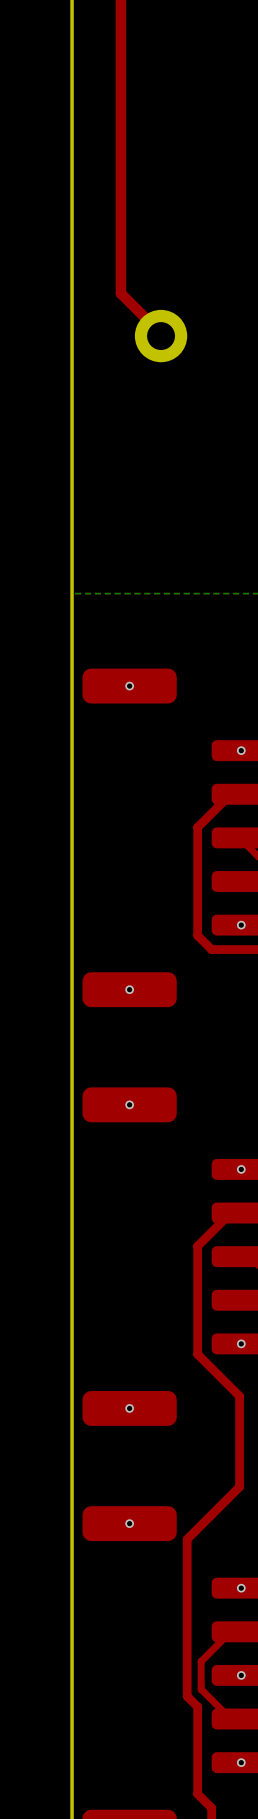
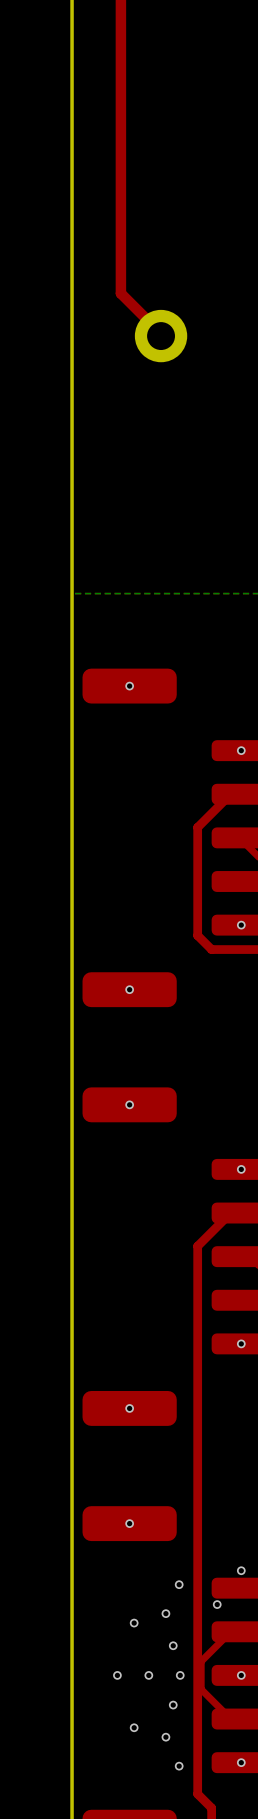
top track: (197, 1354) (239, 1396) (239, 1486) (187, 1539) (187, 1696) (197, 1706) -> (197, 1354) (197, 1706)
via: none -> (241, 1570)
via: none -> (179, 1584)
via: (241, 1588) -> none
via: none -> (217, 1604)
via: none -> (165, 1613)
via: none -> (134, 1623)
via: none -> (173, 1645)
via: none -> (117, 1675)
via: none -> (148, 1675)
via: none -> (180, 1675)
via: none -> (173, 1705)
via: none -> (134, 1727)
via: none -> (165, 1737)
via: none -> (179, 1766)

